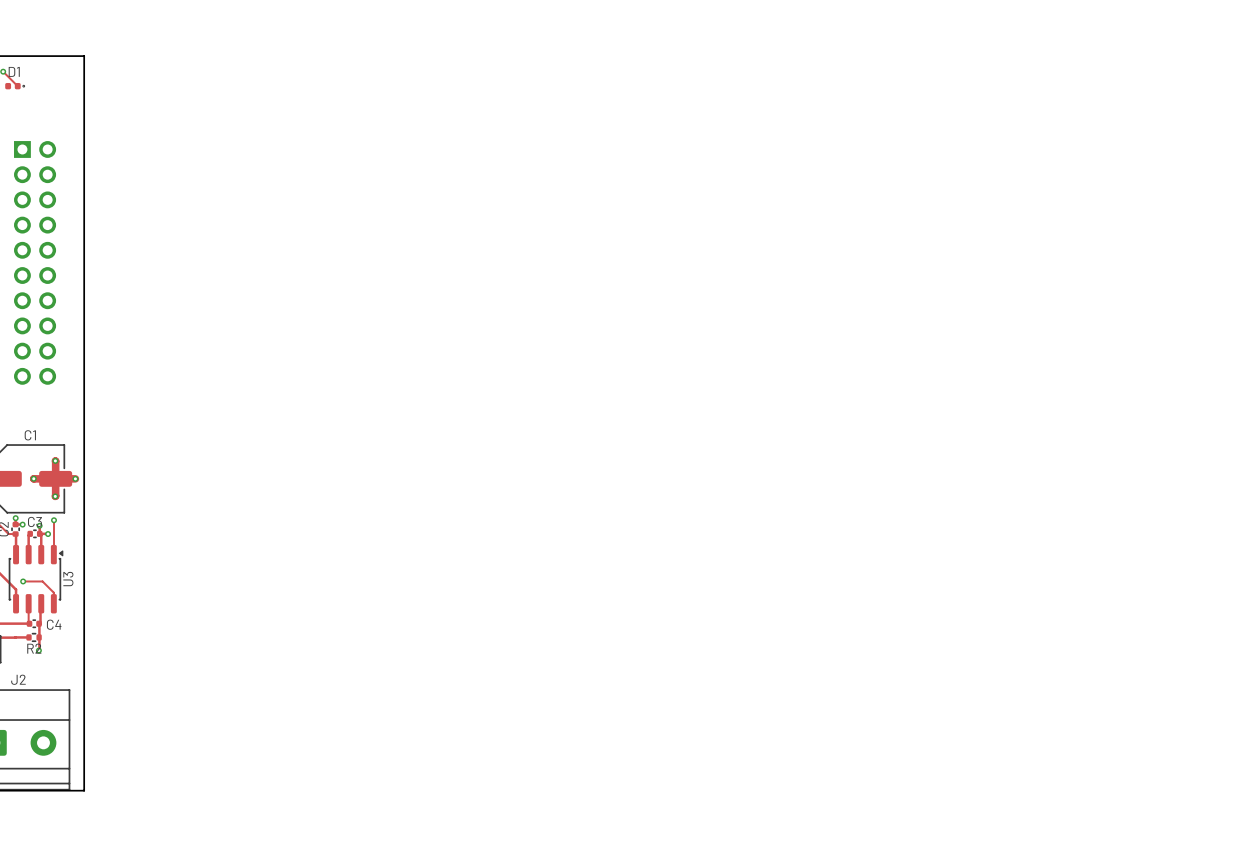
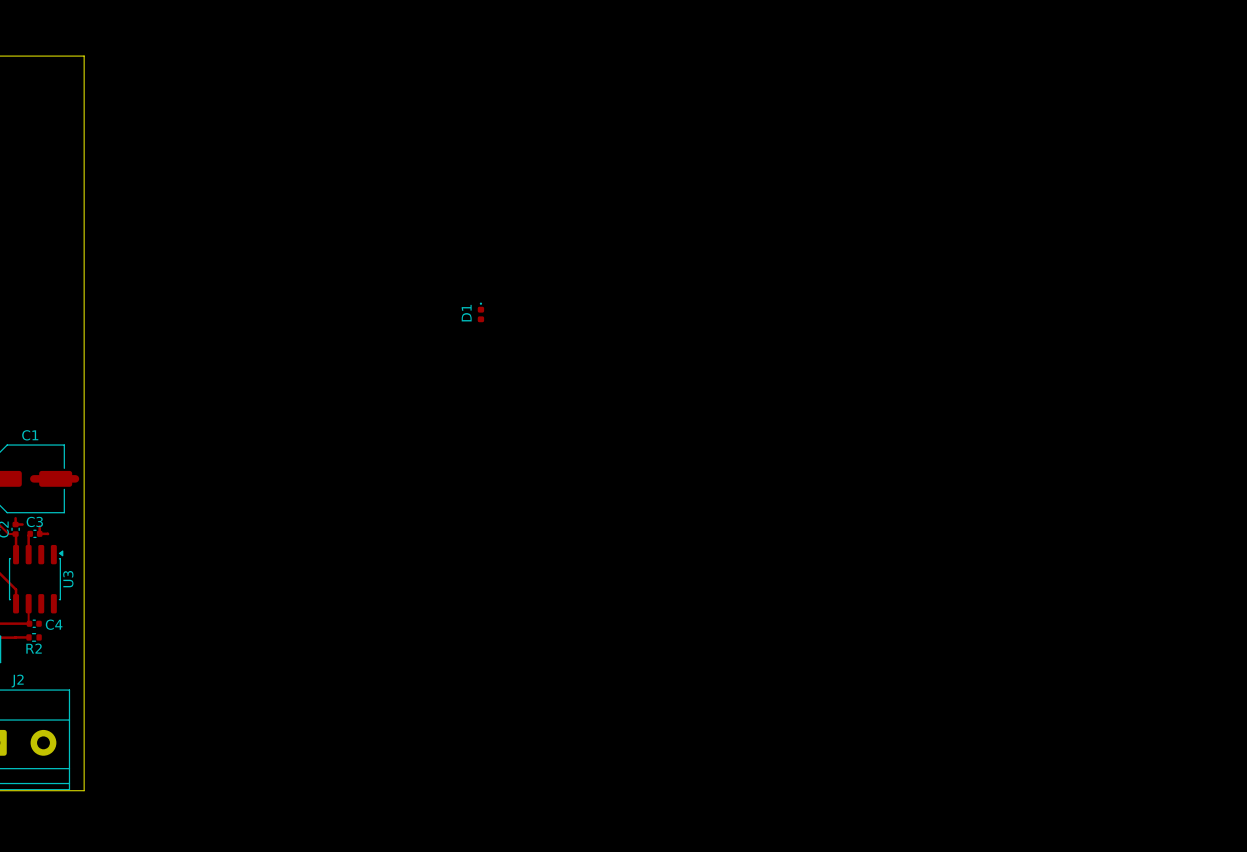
top track: (3, 71) (17, 86) -> none
via: (3, 71) -> none
D1 rotation: 0° (14, 86) -> 90° counterclockwise (480, 312)
D1 position: (14, 86) -> (480, 312)
part: (35, 262) -> none
top track: (55, 460) (55, 496) -> none
via: (55, 460) -> none
via: (33, 478) -> none
via: (75, 478) -> none
via: (55, 496) -> none
via: (15, 518) -> none
top track: (54, 520) (53, 554) -> none
via: (54, 520) -> none
via: (22, 524) -> none
via: (39, 525) -> none
top track: (39, 533) (41, 554) -> none
via: (48, 534) -> none
top track: (23, 581) (42, 581) (53, 592) (53, 603) -> none
via: (23, 581) -> none
top track: (41, 603) (38, 650) -> none
via: (38, 650) -> none

